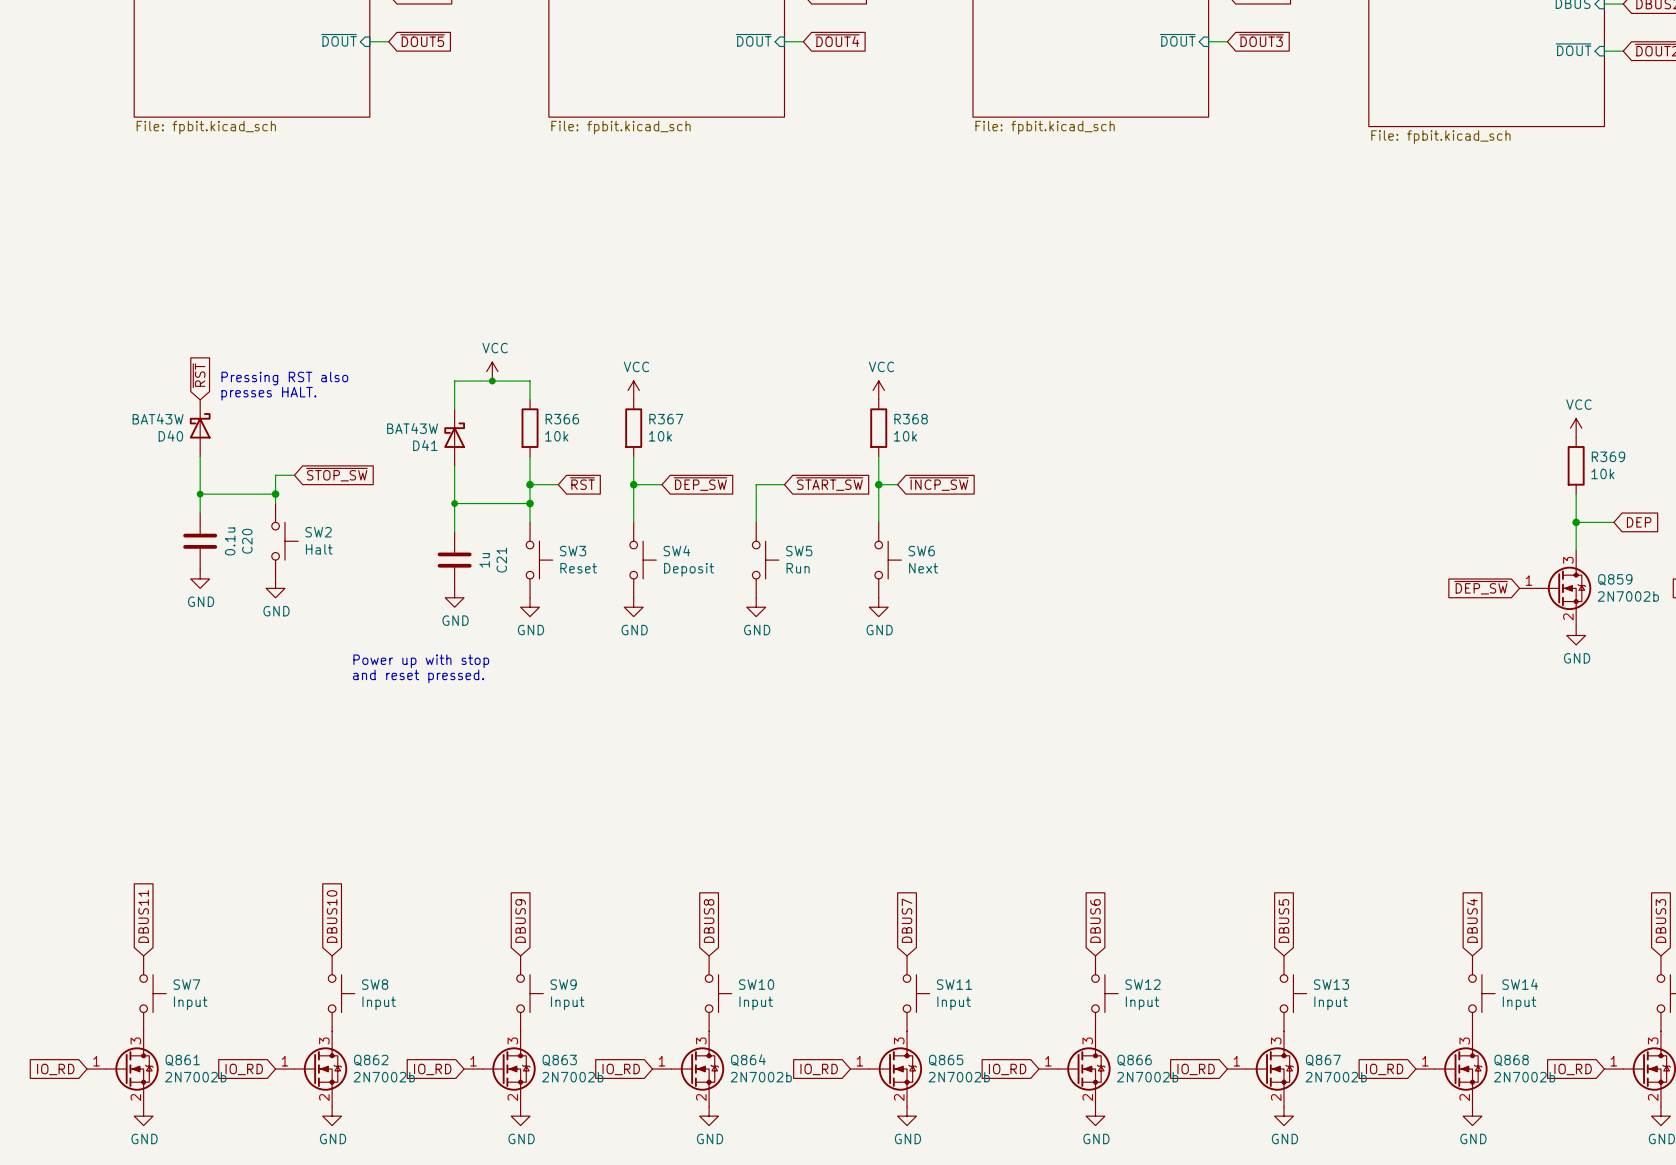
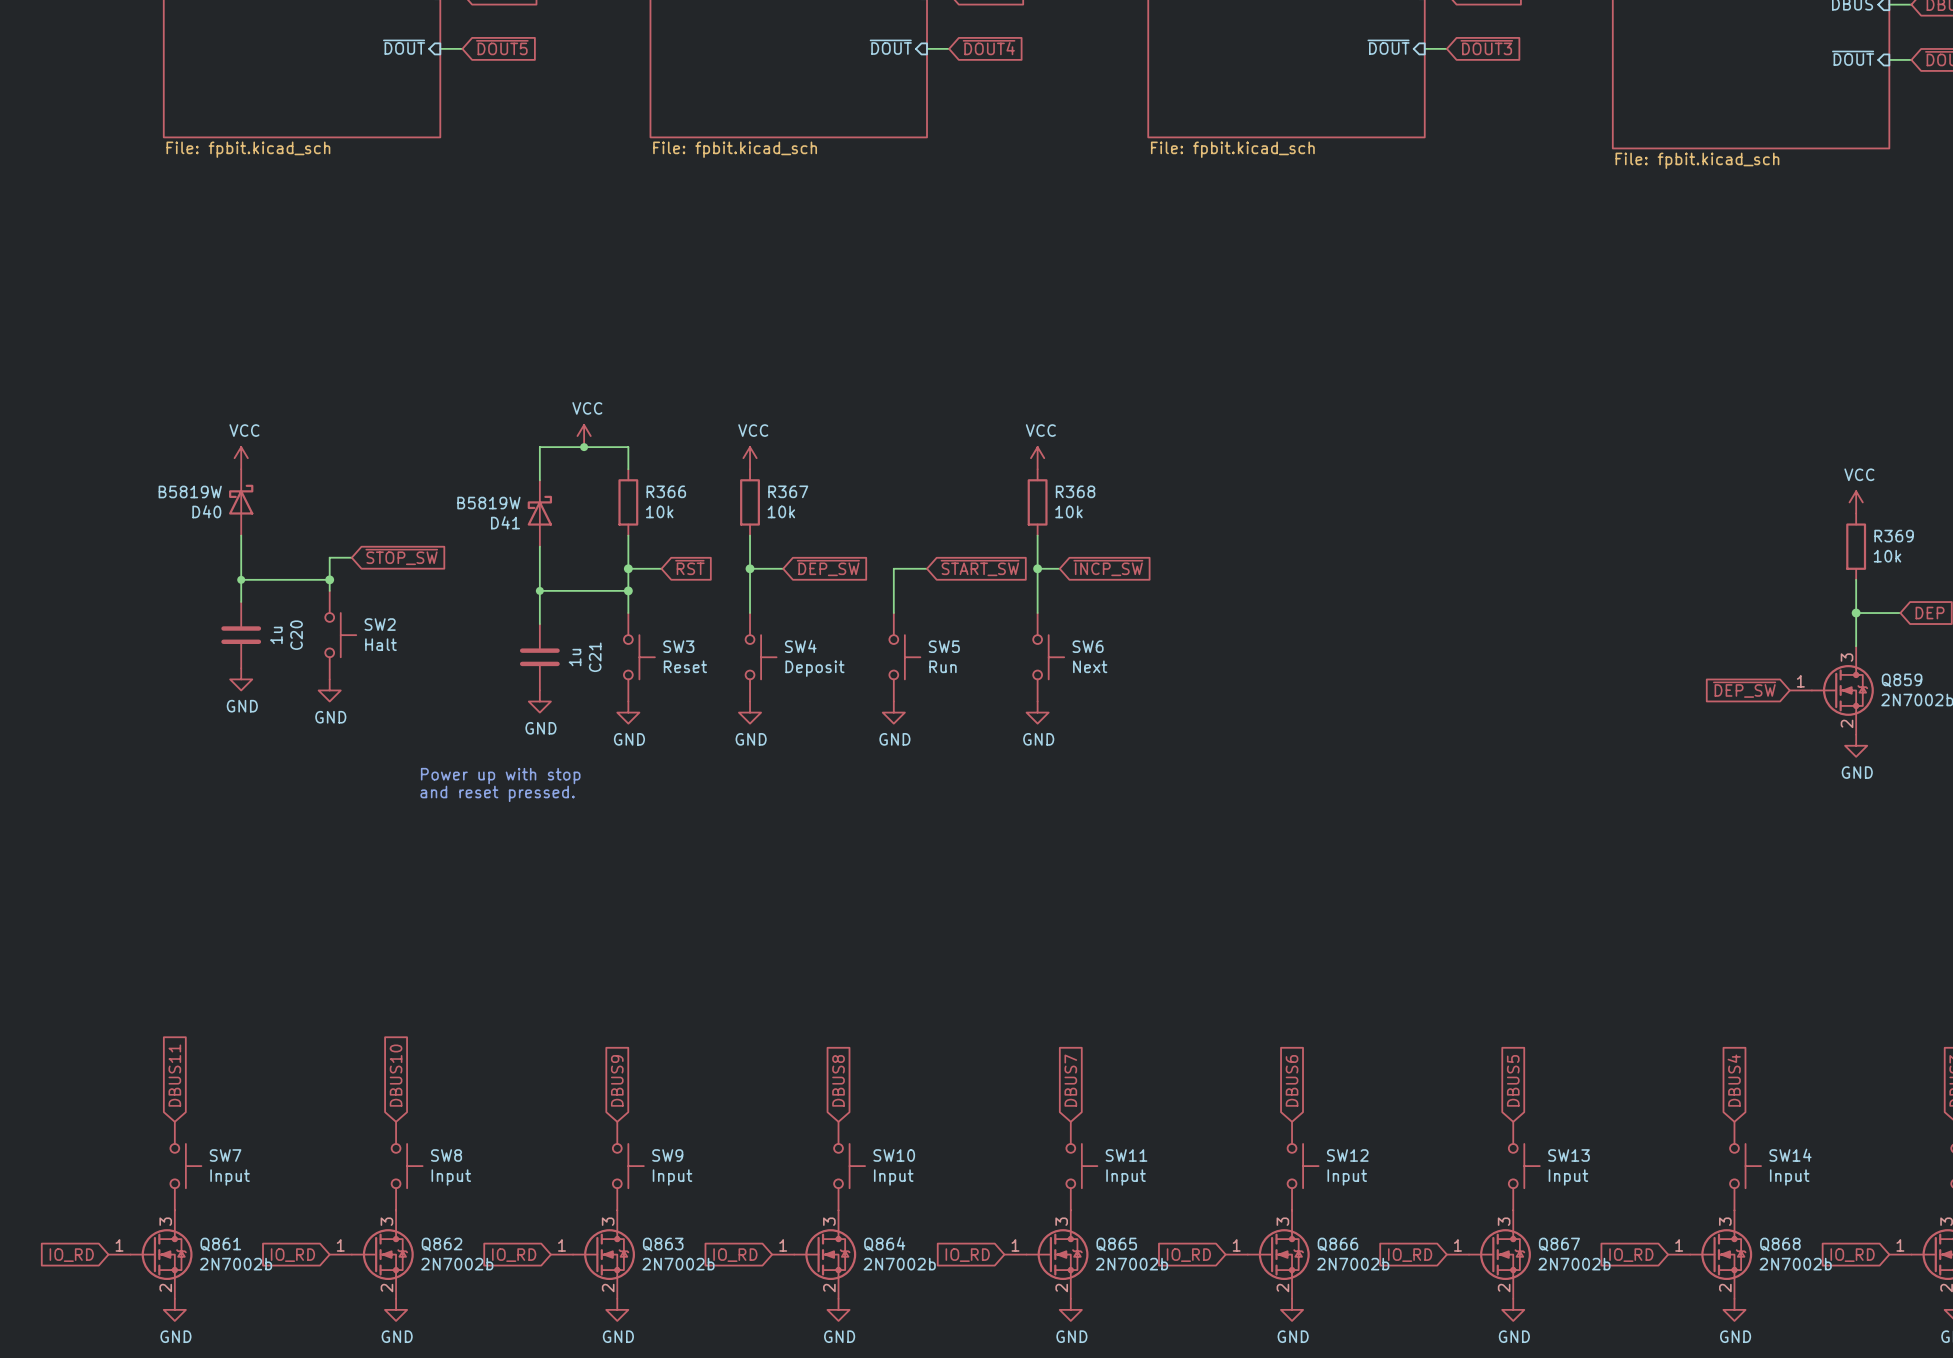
global label: ~{RST} (199, 375) -> none
text: Pressing RST also (284, 378) -> none
power symbol: none -> VCC (241, 458)
text: presses HALT. (268, 393) -> none
D40 value: BAT43W (158, 419) -> B5819W (190, 491)
D41 value: BAT43W (412, 428) -> B5819W (488, 503)
C20 value: 0.1u (230, 541) -> 1u (276, 635)

